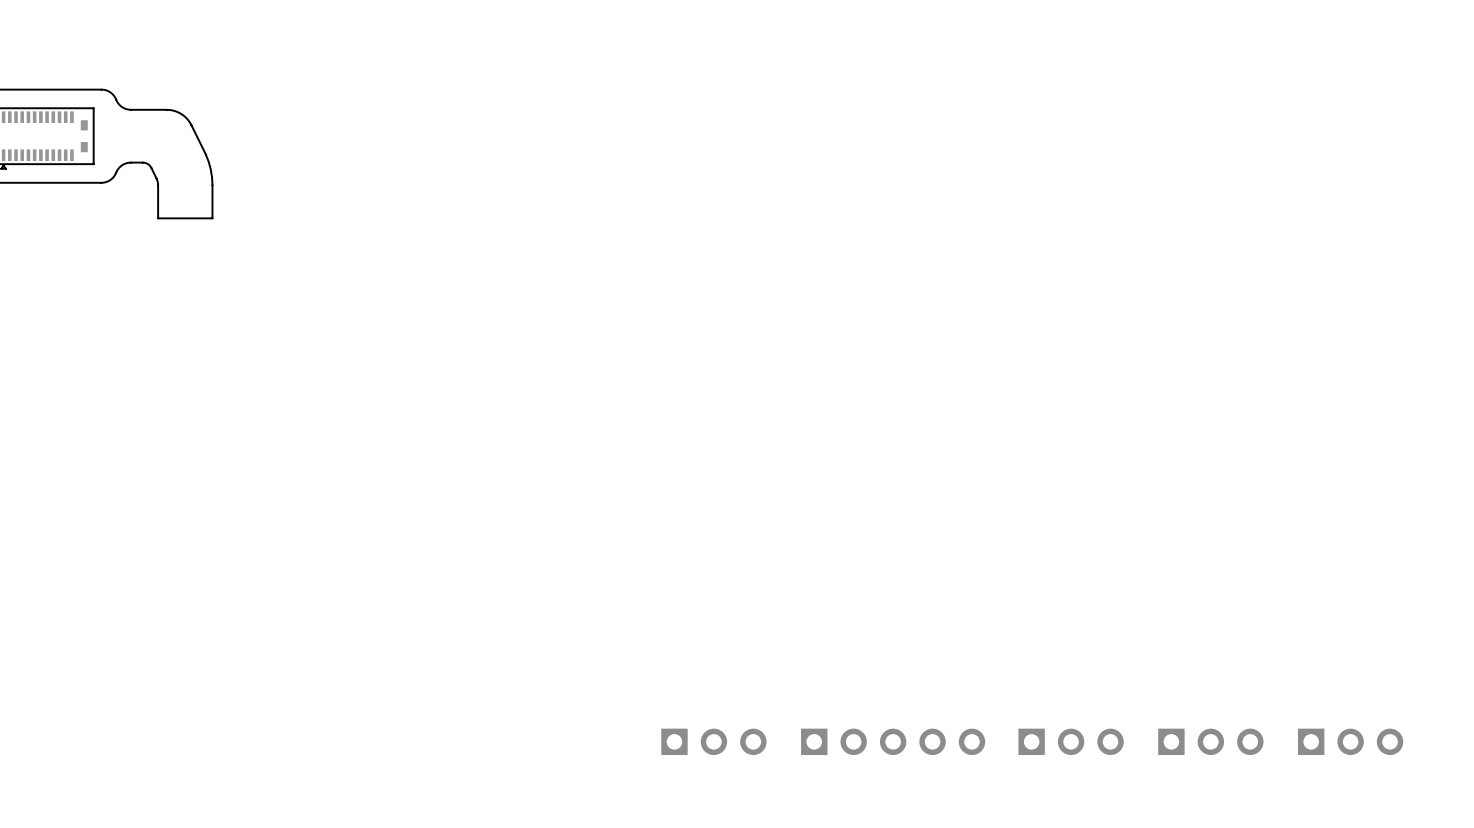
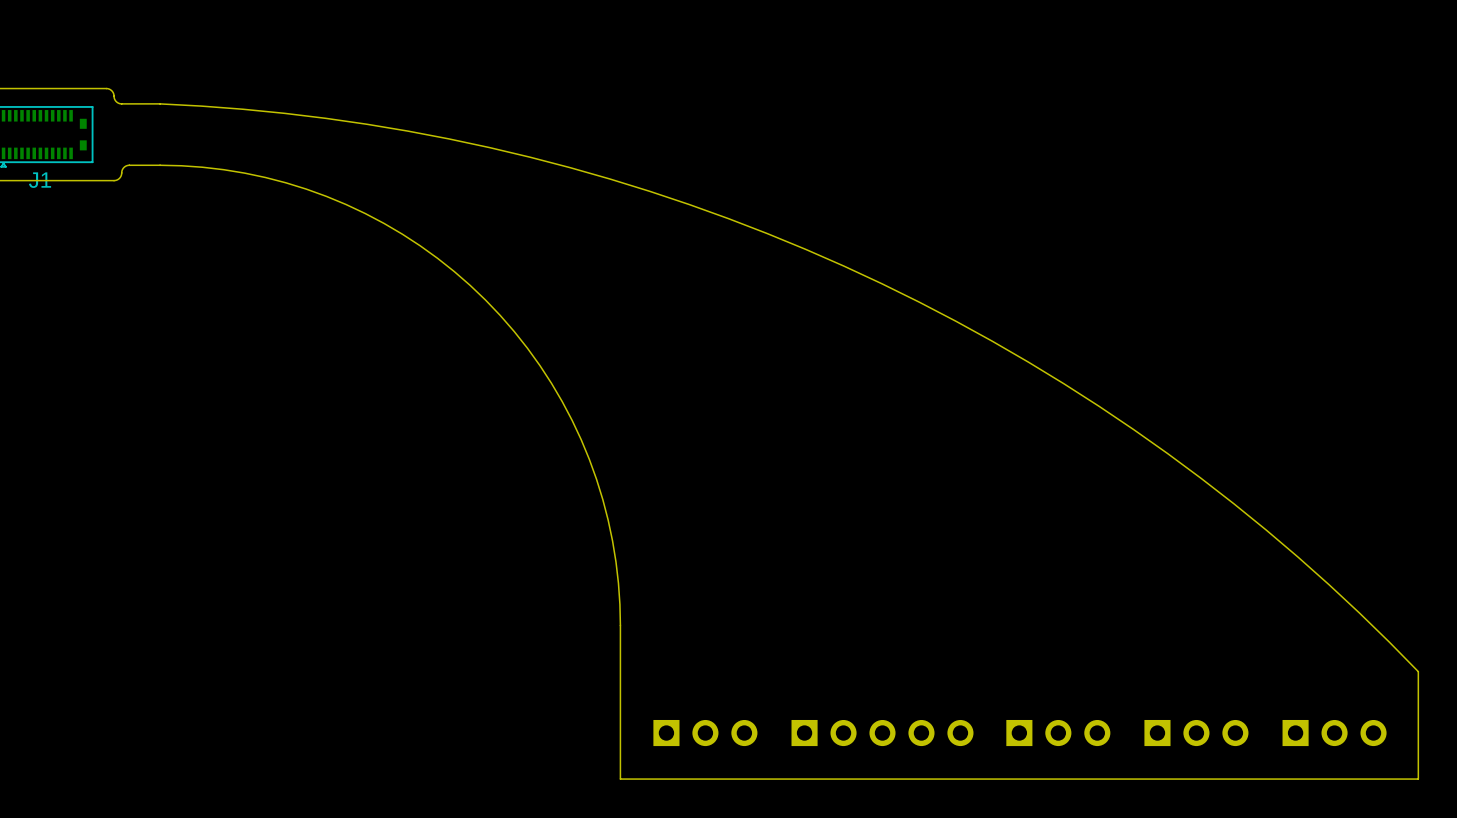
board edge: (101, 89) (111, 93) (119, 104) (125, 108) (172, 110) (181, 114) (188, 120) (205, 154) (210, 169) (212, 218) (158, 218) (157, 181) (150, 167) (145, 163) (125, 163) (119, 167) (111, 178) (101, 182) -> (100, 88) (111, 90) (115, 100) (120, 103) (201, 106) (325, 118) (448, 138) (570, 167) (650, 191) (767, 233) (844, 266) (956, 321) (1064, 383) (1133, 429) (1200, 478) (1297, 556) (1389, 641) (1418, 671) (1418, 779) (620, 779) (619, 604) (616, 562) (608, 520) (596, 479) (572, 420) (539, 365) (514, 331) (485, 300) (437, 258) (384, 223) (326, 196) (265, 177) (202, 167) (128, 165) (123, 168) (117, 179) (100, 180)
J1 name: none -> J1 (40, 180)

